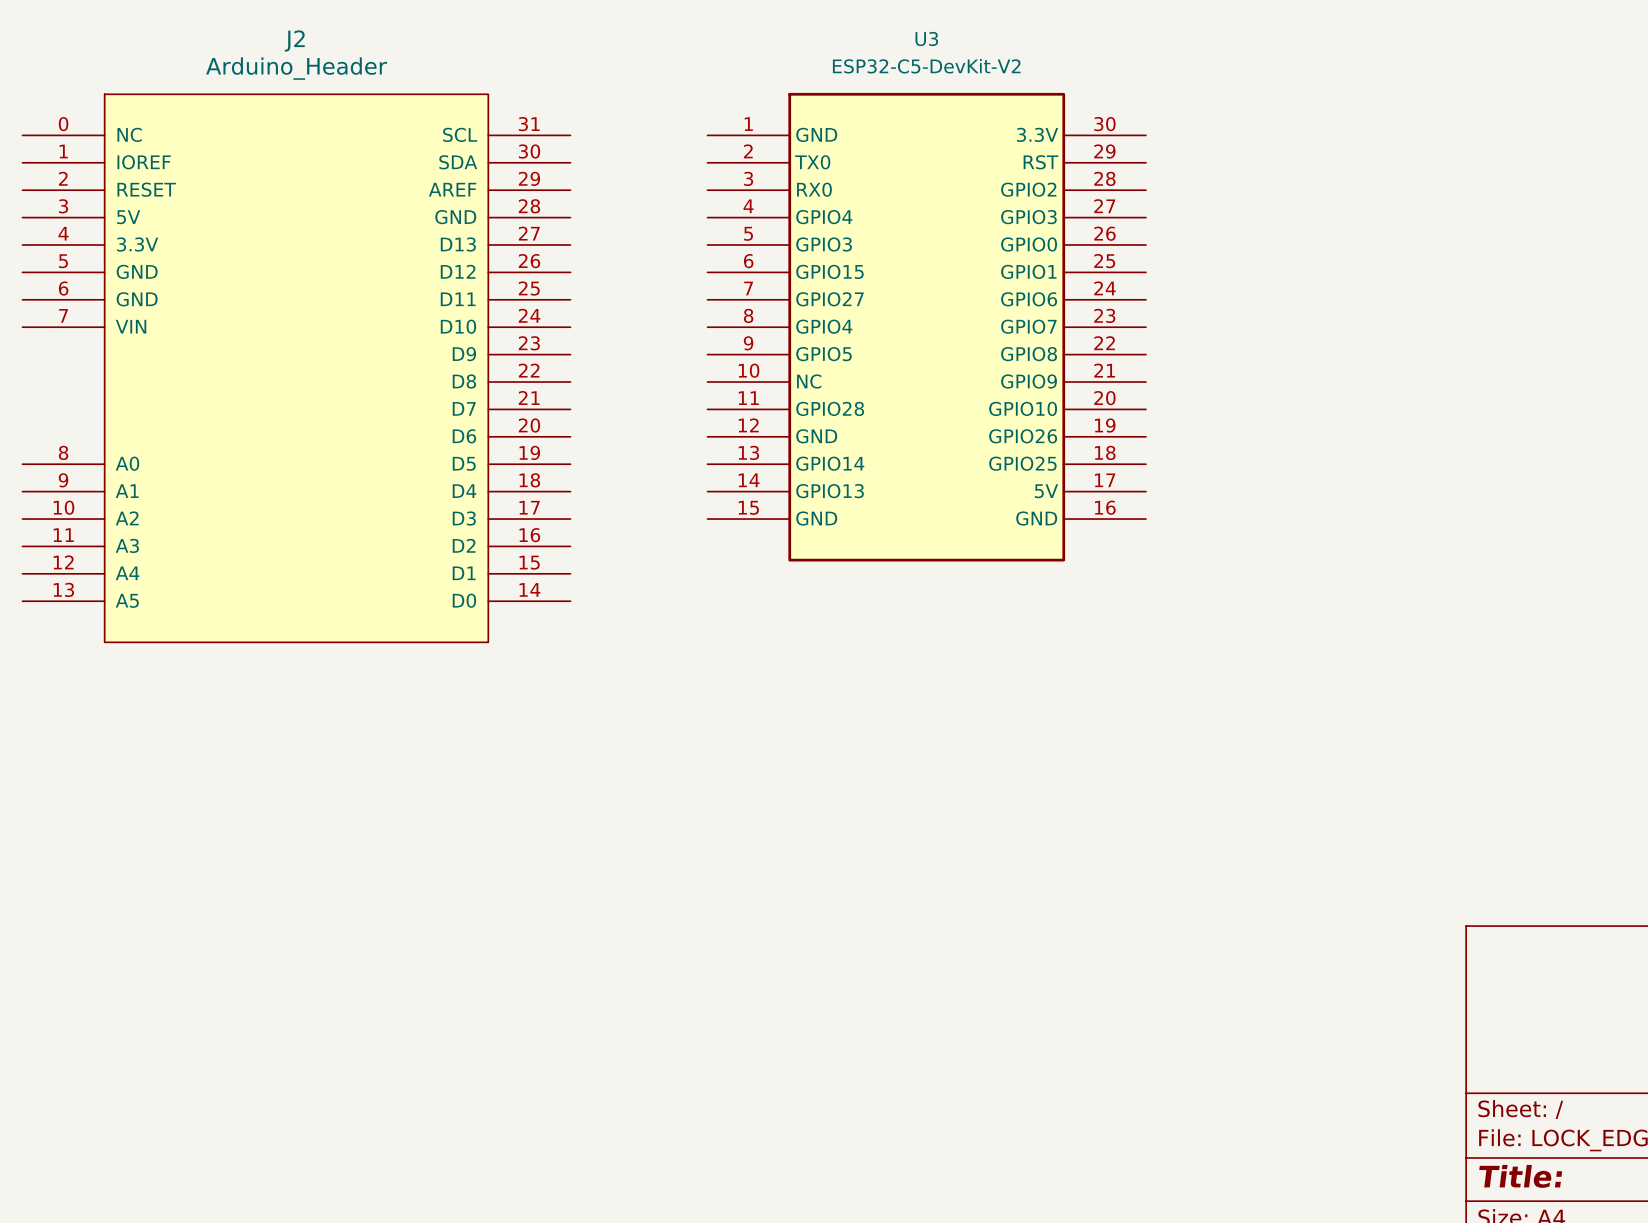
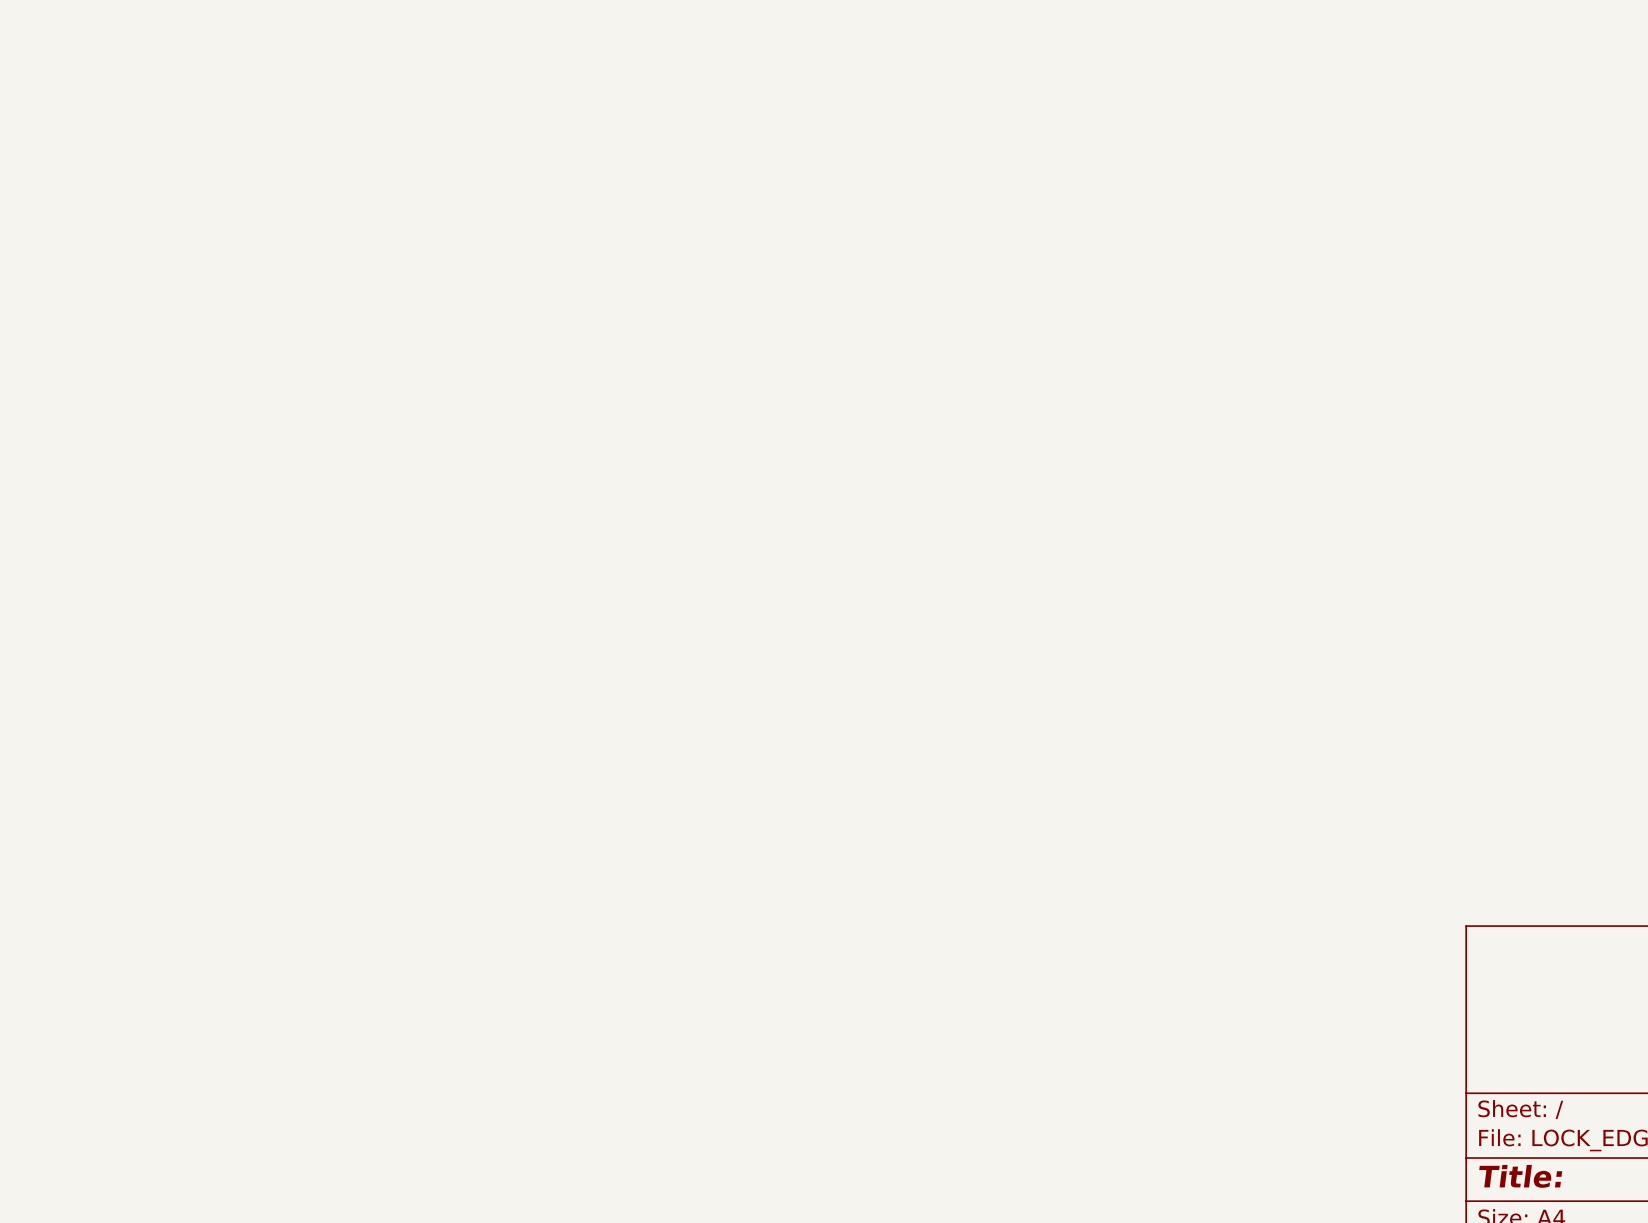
U3: ESP32-C5-DevKit-V2 (926, 327) -> none
J2: Arduino_Header (296, 368) -> none

